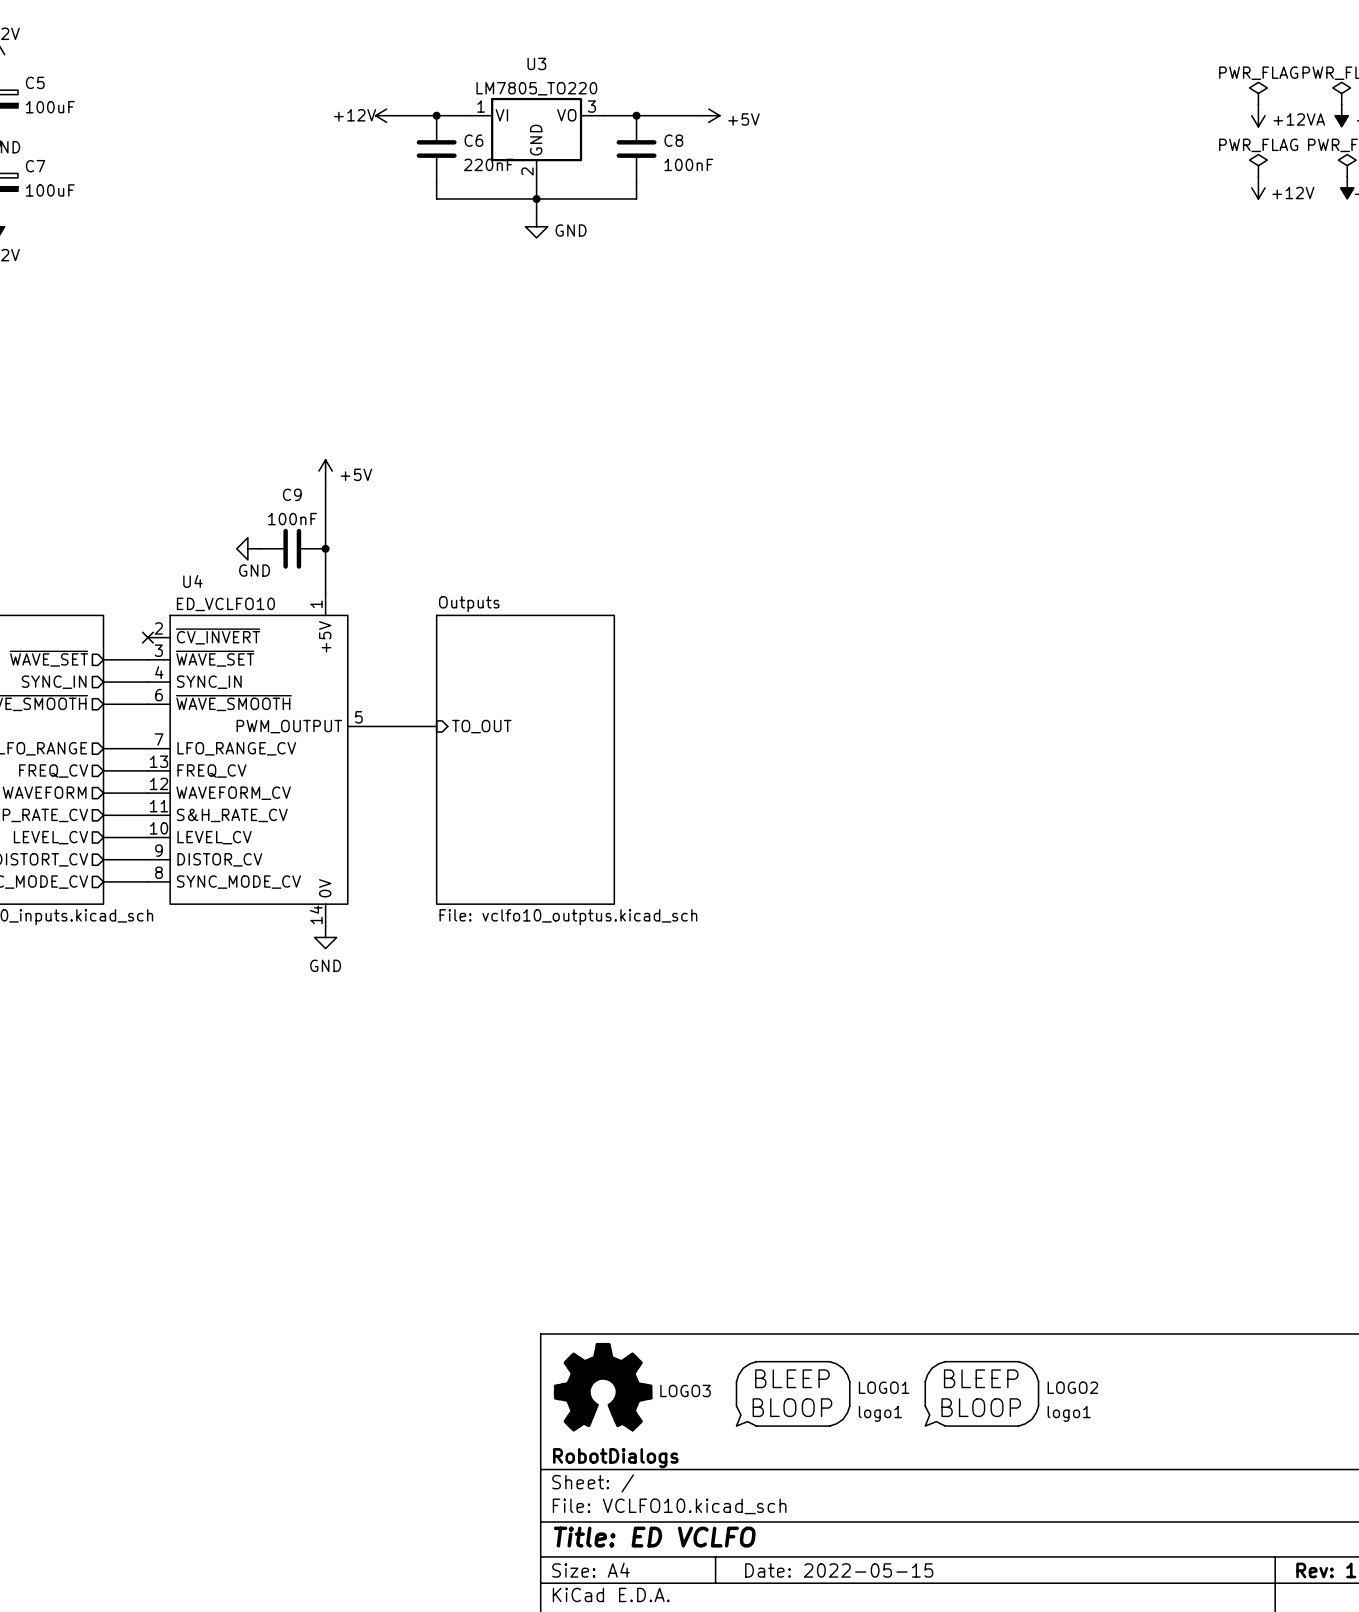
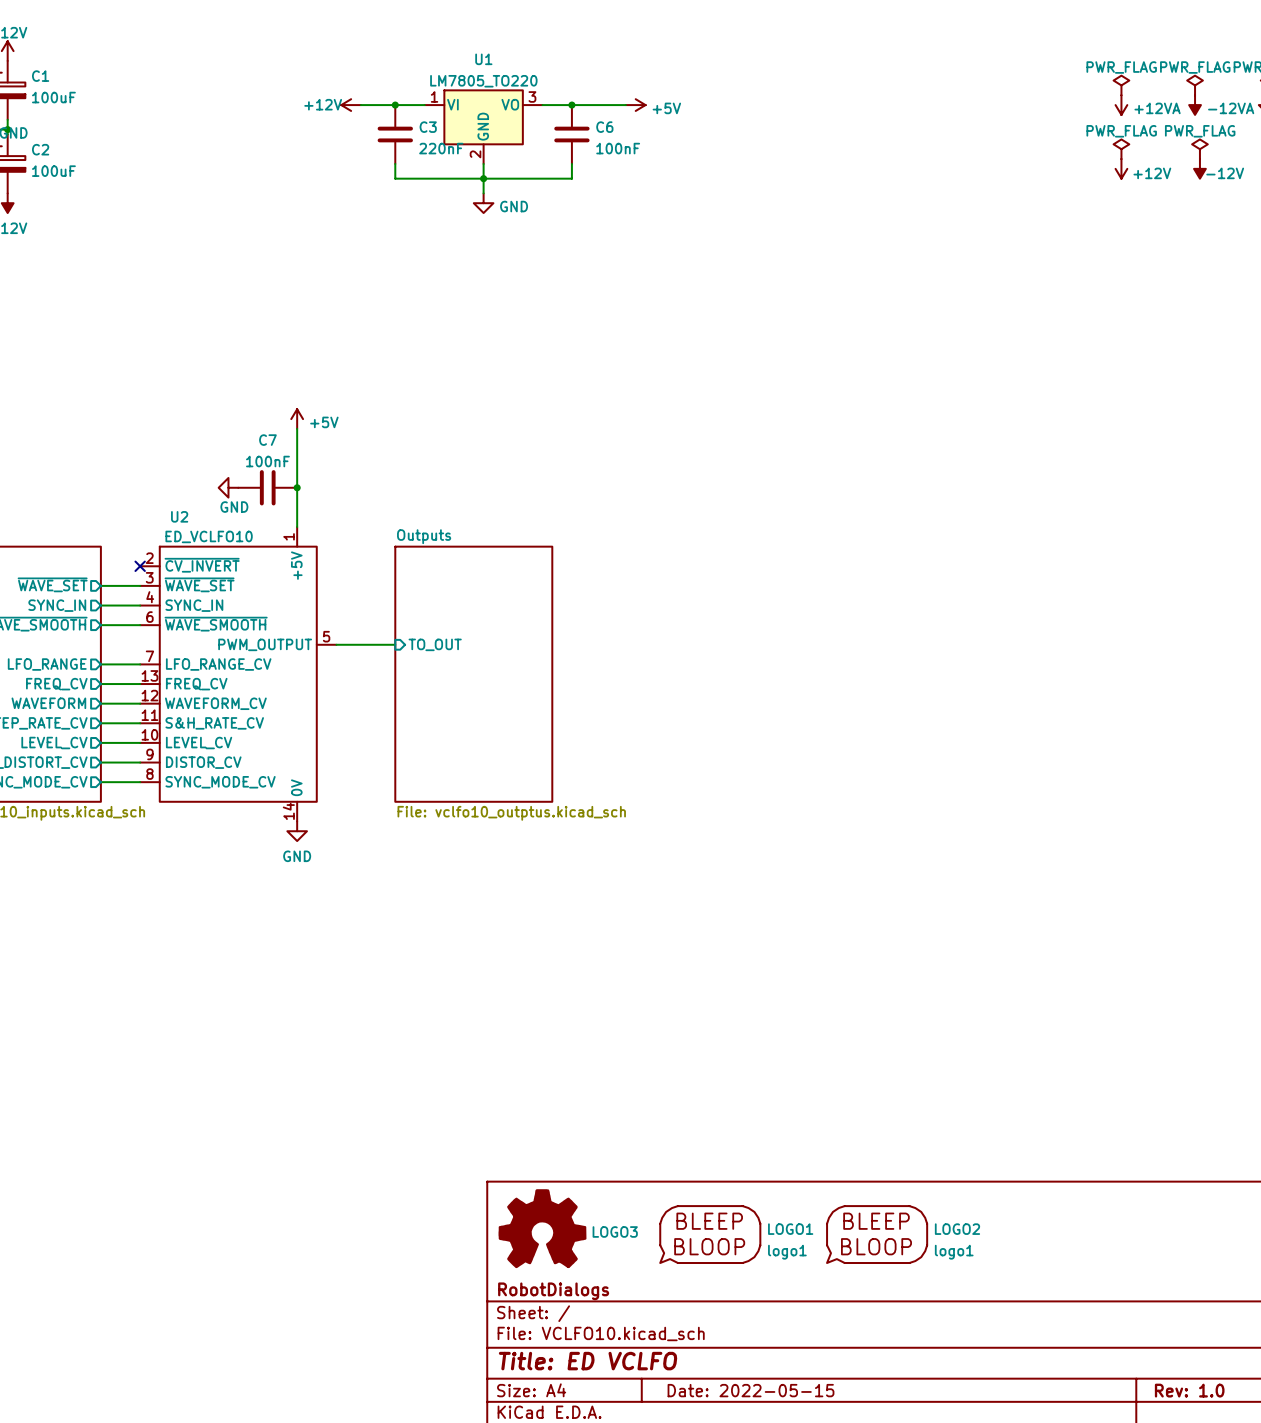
U3 name: U3 (536, 63) -> U1 (483, 59)
C5 name: C5 (35, 82) -> C1 (40, 76)
C6 name: C6 (473, 140) -> C3 (428, 127)
C8 name: C8 (673, 140) -> C6 (604, 127)
C7 name: C7 (35, 166) -> C2 (40, 149)
C9 name: C9 (292, 494) -> C7 (267, 440)
U4 name: U4 (192, 581) -> U2 (179, 516)

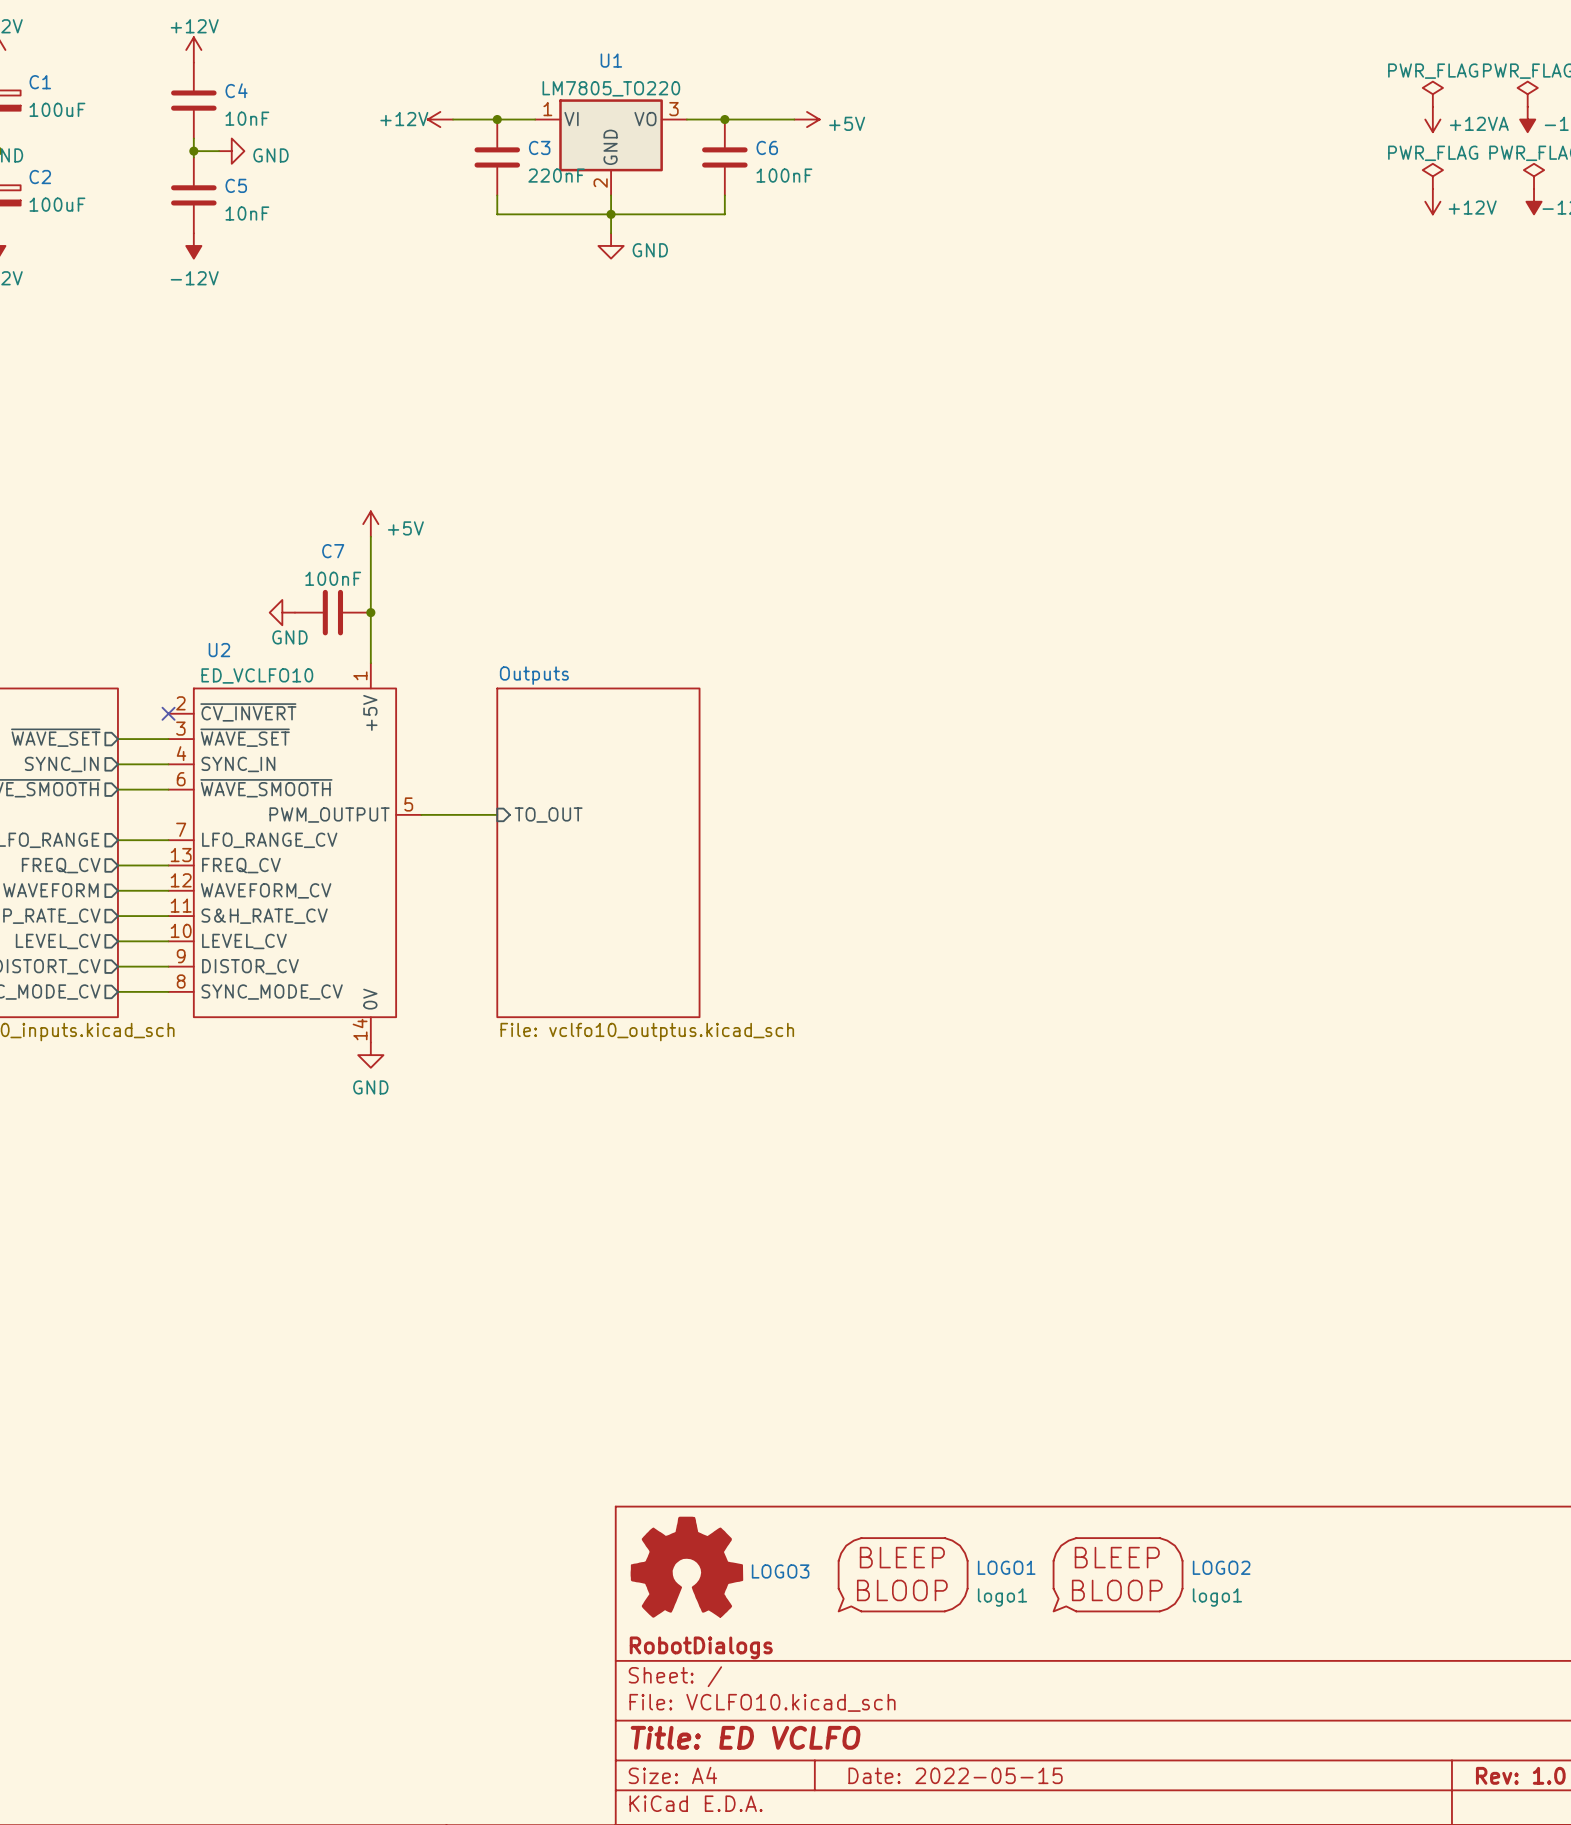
power symbol: none -> +12V (193, 49)
C4: none -> 10nF (193, 100)
wire: none -> (193, 138) (193, 157)
wire: none -> (193, 151) (219, 151)
junction: none -> (193, 151)
power symbol: none -> GND (231, 151)
C5: none -> 10nF (193, 195)
power symbol: none -> -12V (193, 245)

